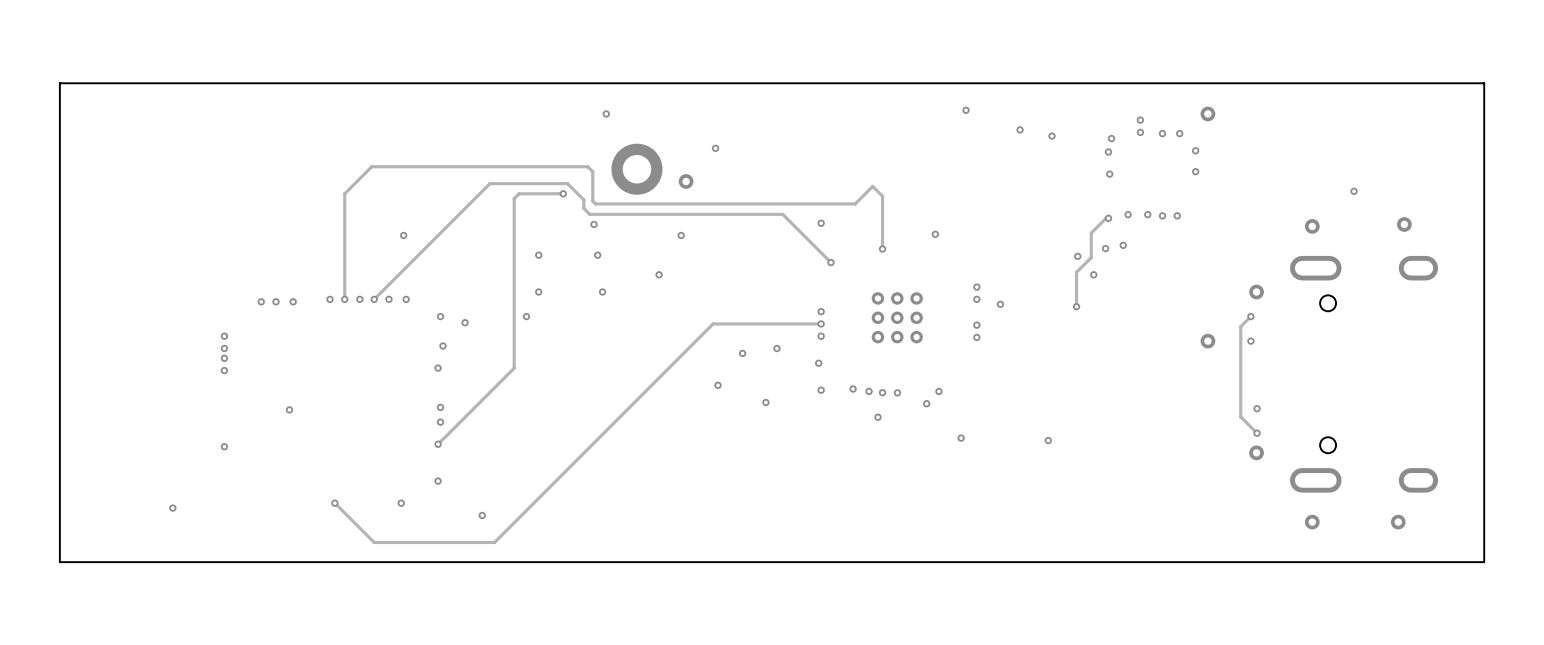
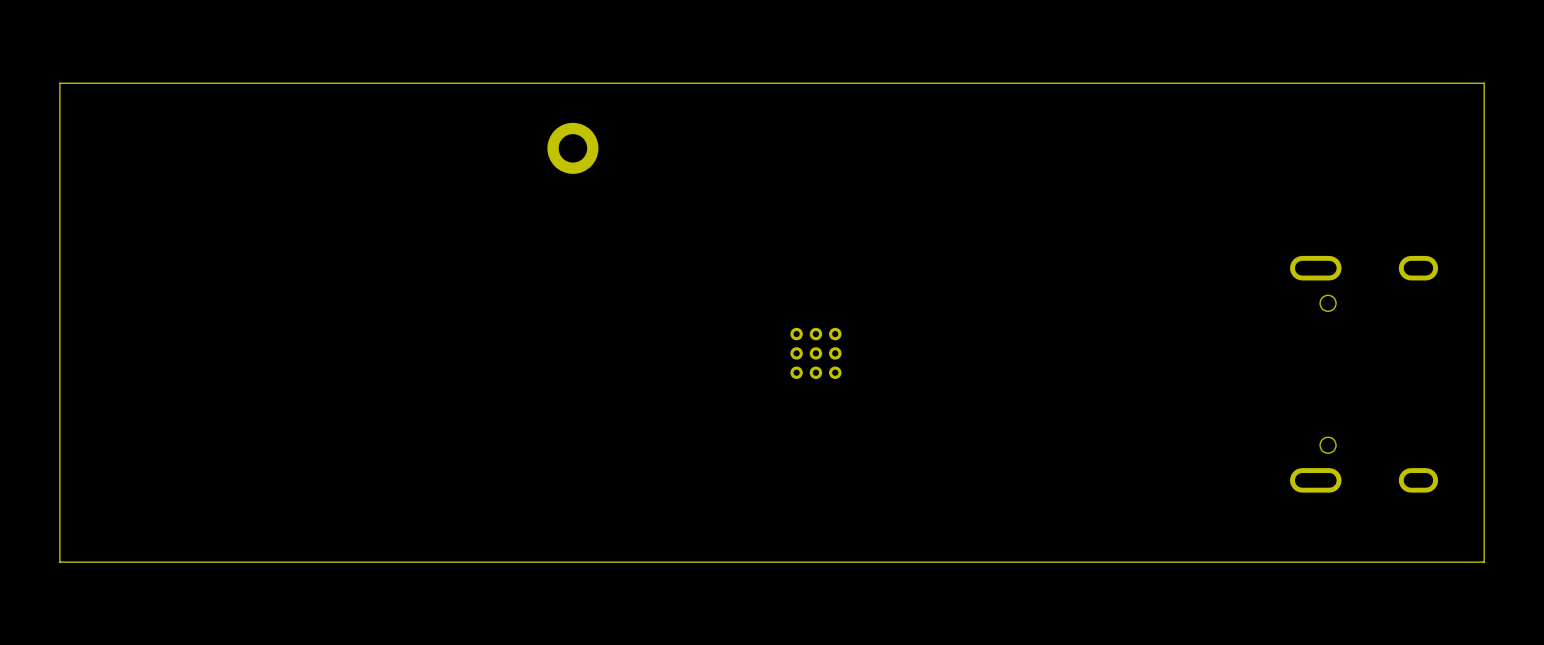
via: (966, 110) -> none
via: (606, 113) -> none
via: (1207, 113) -> none
via: (1140, 120) -> none
via: (1020, 129) -> none
via: (1140, 132) -> none
via: (1162, 133) -> none
via: (1179, 133) -> none
via: (1051, 136) -> none
via: (1111, 138) -> none
via: (715, 148) -> none
via: (1195, 150) -> none
via: (1108, 152) -> none
part position: (636, 169) -> (572, 148)
via: (1195, 171) -> none
via: (1109, 174) -> none
via: (686, 181) -> none
via: (1354, 191) -> none
track: (563, 193) (519, 193) (514, 198) (514, 368) (438, 444) -> none
via: (563, 193) -> none
via: (1128, 214) -> none
via: (1147, 214) -> none
via: (1162, 215) -> none
via: (1177, 215) -> none
track: (1108, 218) (1106, 218) (1091, 233) (1091, 257) (1076, 272) (1076, 306) -> none
via: (1108, 218) -> none
via: (821, 223) -> none
via: (594, 224) -> none
via: (1404, 224) -> none
via: (1312, 226) -> none
via: (935, 234) -> none
via: (403, 235) -> none
via: (681, 235) -> none
via: (1123, 245) -> none
via: (1105, 248) -> none
track: (882, 249) (882, 196) (872, 186) (855, 203) (595, 203) (592, 201) (592, 171) (587, 166) (371, 166) (344, 193) (344, 299) -> none
via: (882, 249) -> none
via: (538, 255) -> none
via: (597, 255) -> none
via: (1077, 256) -> none
track: (830, 262) (782, 214) (589, 214) (583, 208) (583, 199) (567, 183) (489, 183) (374, 299) -> none
via: (830, 262) -> none
via: (659, 274) -> none
via: (1093, 274) -> none
via: (976, 287) -> none
via: (538, 292) -> none
via: (602, 292) -> none
via: (1256, 292) -> none
via: (330, 299) -> none
via: (344, 299) -> none
via: (359, 299) -> none
via: (374, 299) -> none
via: (388, 299) -> none
via: (406, 299) -> none
via: (976, 299) -> none
via: (261, 301) -> none
via: (275, 301) -> none
via: (293, 301) -> none
via: (1000, 304) -> none
via: (1076, 306) -> none
via: (821, 311) -> none
via: (440, 316) -> none
via: (526, 316) -> none
track: (1250, 316) (1240, 326) (1240, 416) (1257, 433) -> none
via: (1250, 316) -> none
part position: (897, 317) -> (815, 353)
via: (465, 322) -> none
track: (821, 323) (713, 323) (494, 542) (374, 542) (334, 503) -> none
via: (821, 323) -> none
via: (976, 325) -> none
via: (224, 336) -> none
via: (821, 336) -> none
via: (976, 337) -> none
via: (1207, 341) -> none
via: (1250, 341) -> none
via: (442, 346) -> none
via: (224, 348) -> none
via: (776, 348) -> none
via: (742, 353) -> none
via: (224, 358) -> none
via: (818, 363) -> none
via: (438, 368) -> none
via: (224, 370) -> none
via: (718, 385) -> none
via: (853, 389) -> none
via: (821, 390) -> none
via: (869, 391) -> none
via: (938, 391) -> none
via: (882, 392) -> none
via: (897, 392) -> none
via: (765, 402) -> none
via: (926, 403) -> none
via: (440, 407) -> none
via: (1257, 408) -> none
via: (289, 409) -> none
via: (877, 417) -> none
via: (440, 422) -> none
via: (1257, 433) -> none
via: (961, 438) -> none
via: (1048, 440) -> none
via: (438, 444) -> none
via: (224, 446) -> none
via: (1256, 452) -> none
via: (438, 481) -> none
via: (334, 503) -> none
via: (401, 503) -> none
via: (172, 508) -> none
via: (482, 515) -> none
via: (1312, 522) -> none
via: (1398, 522) -> none

